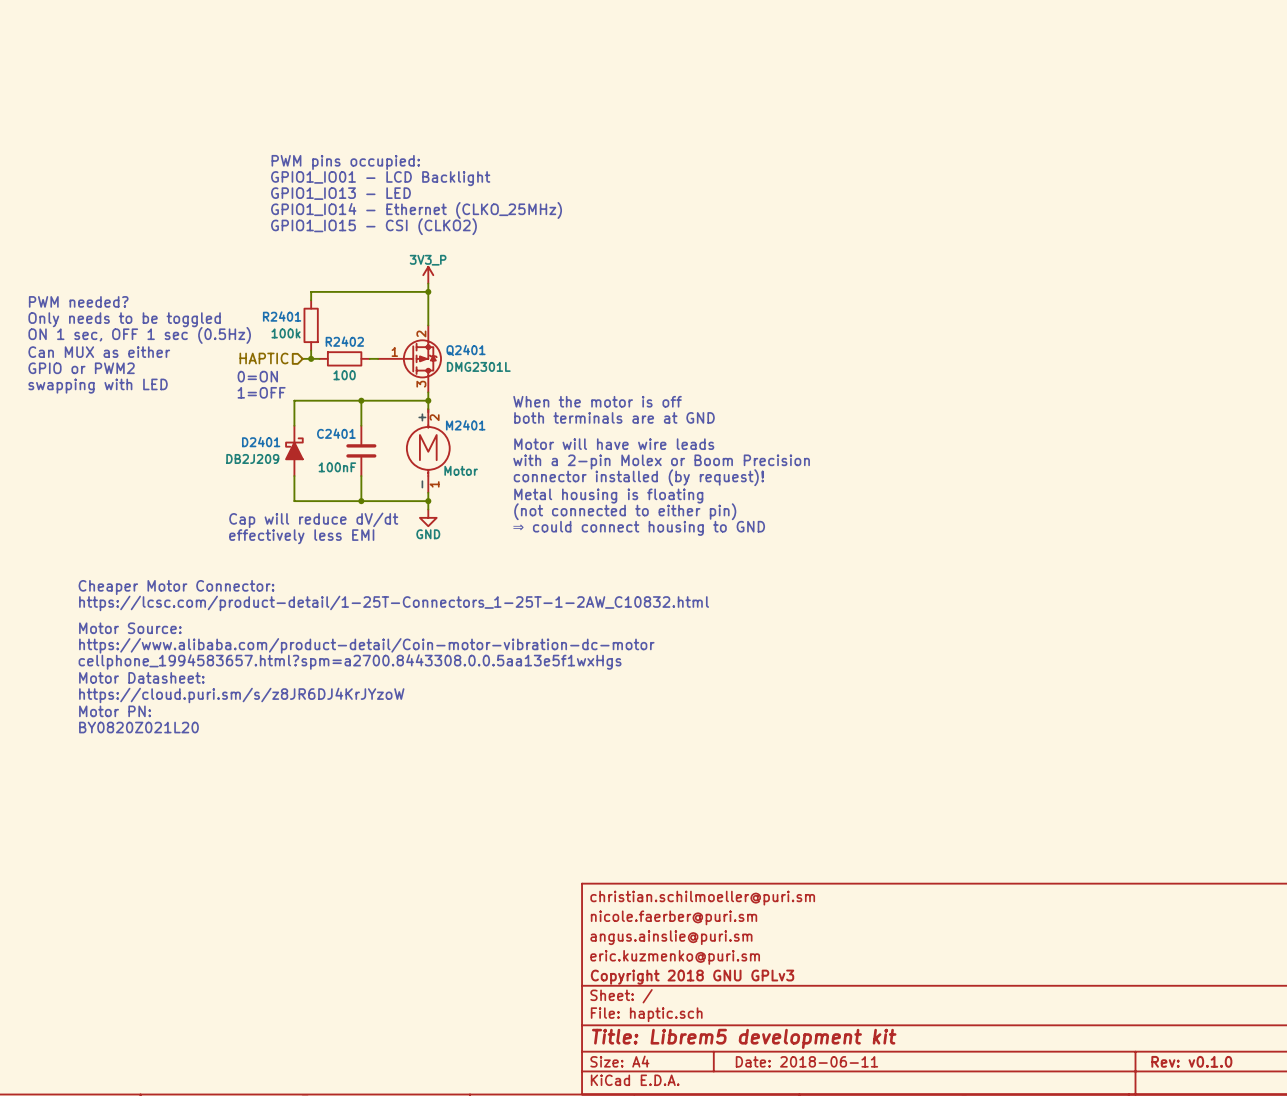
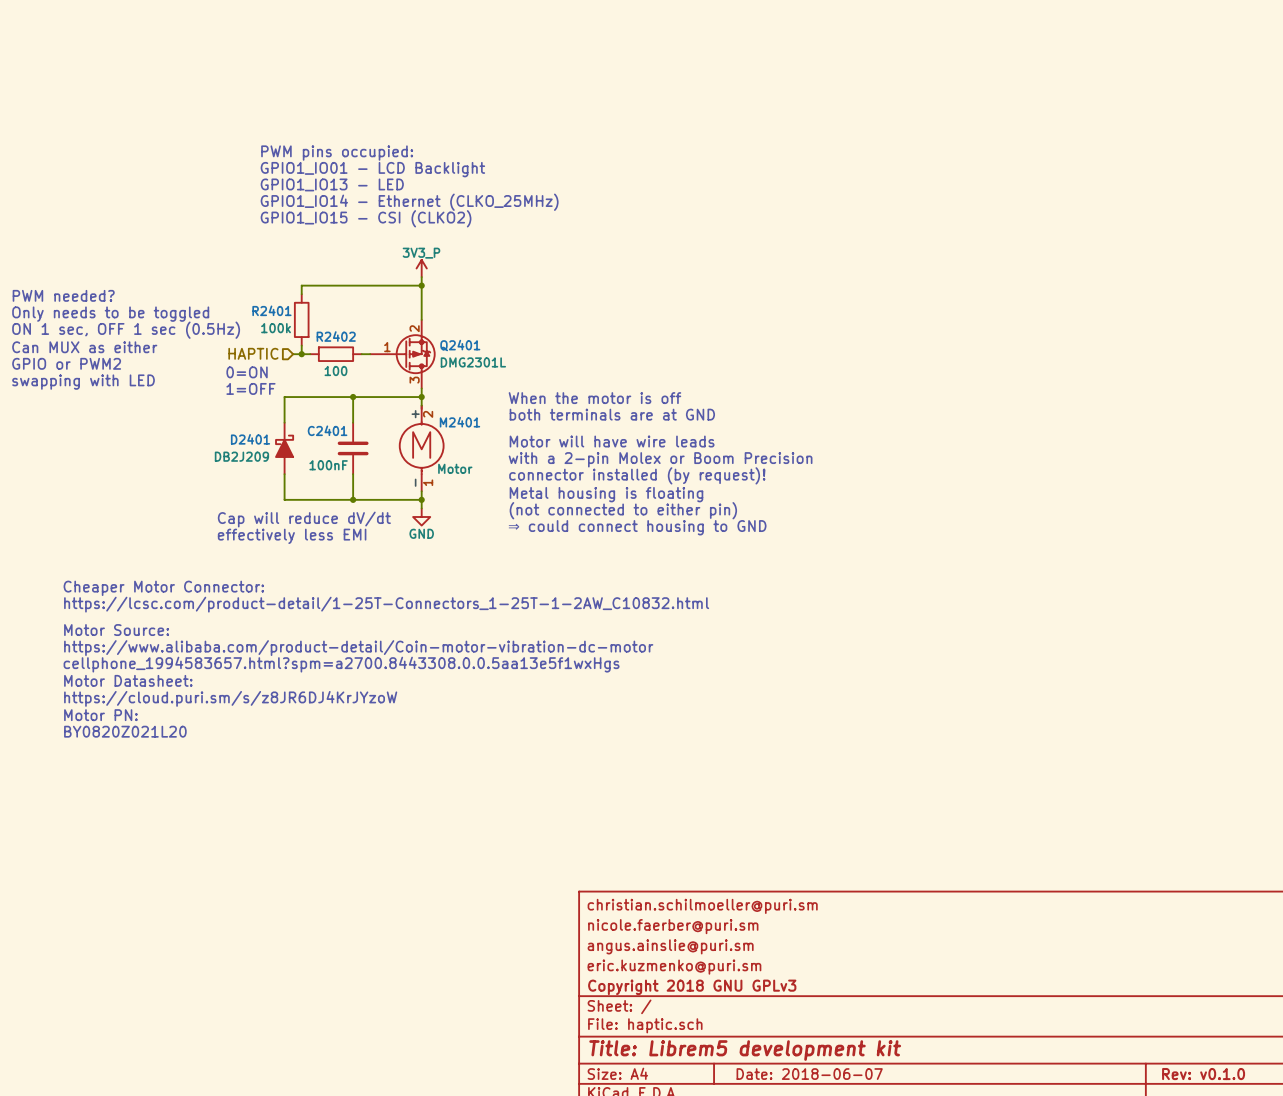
title block: Date: 2018-06-11 (806, 1061) -> Date: 2018-06-07 (809, 1074)

